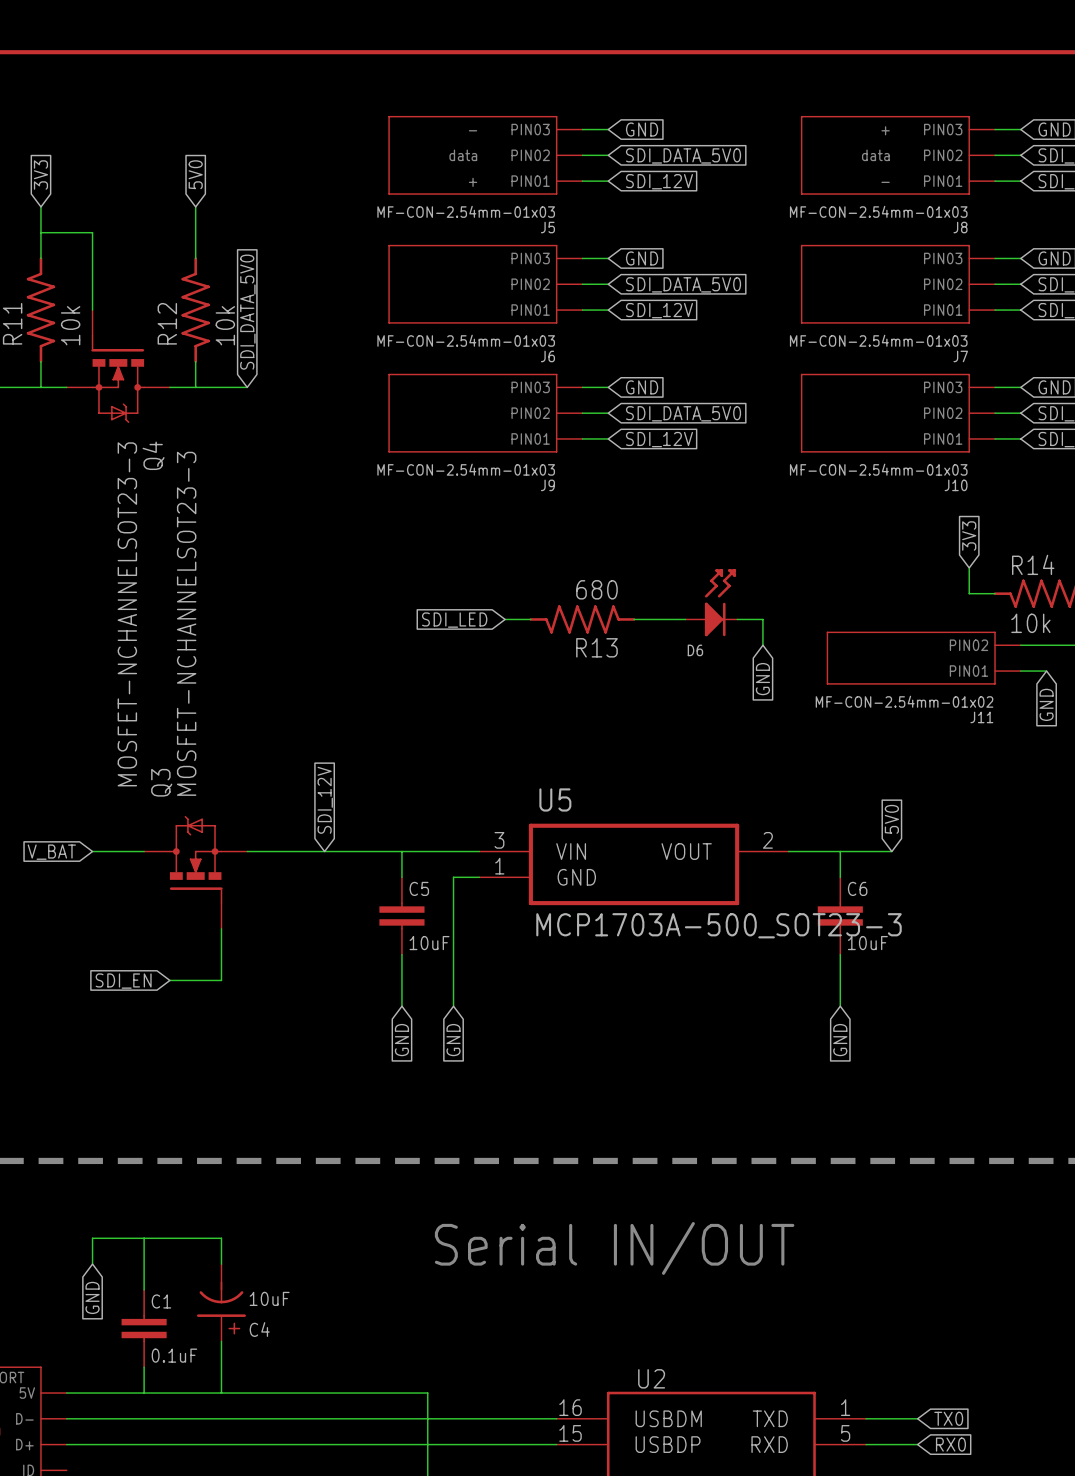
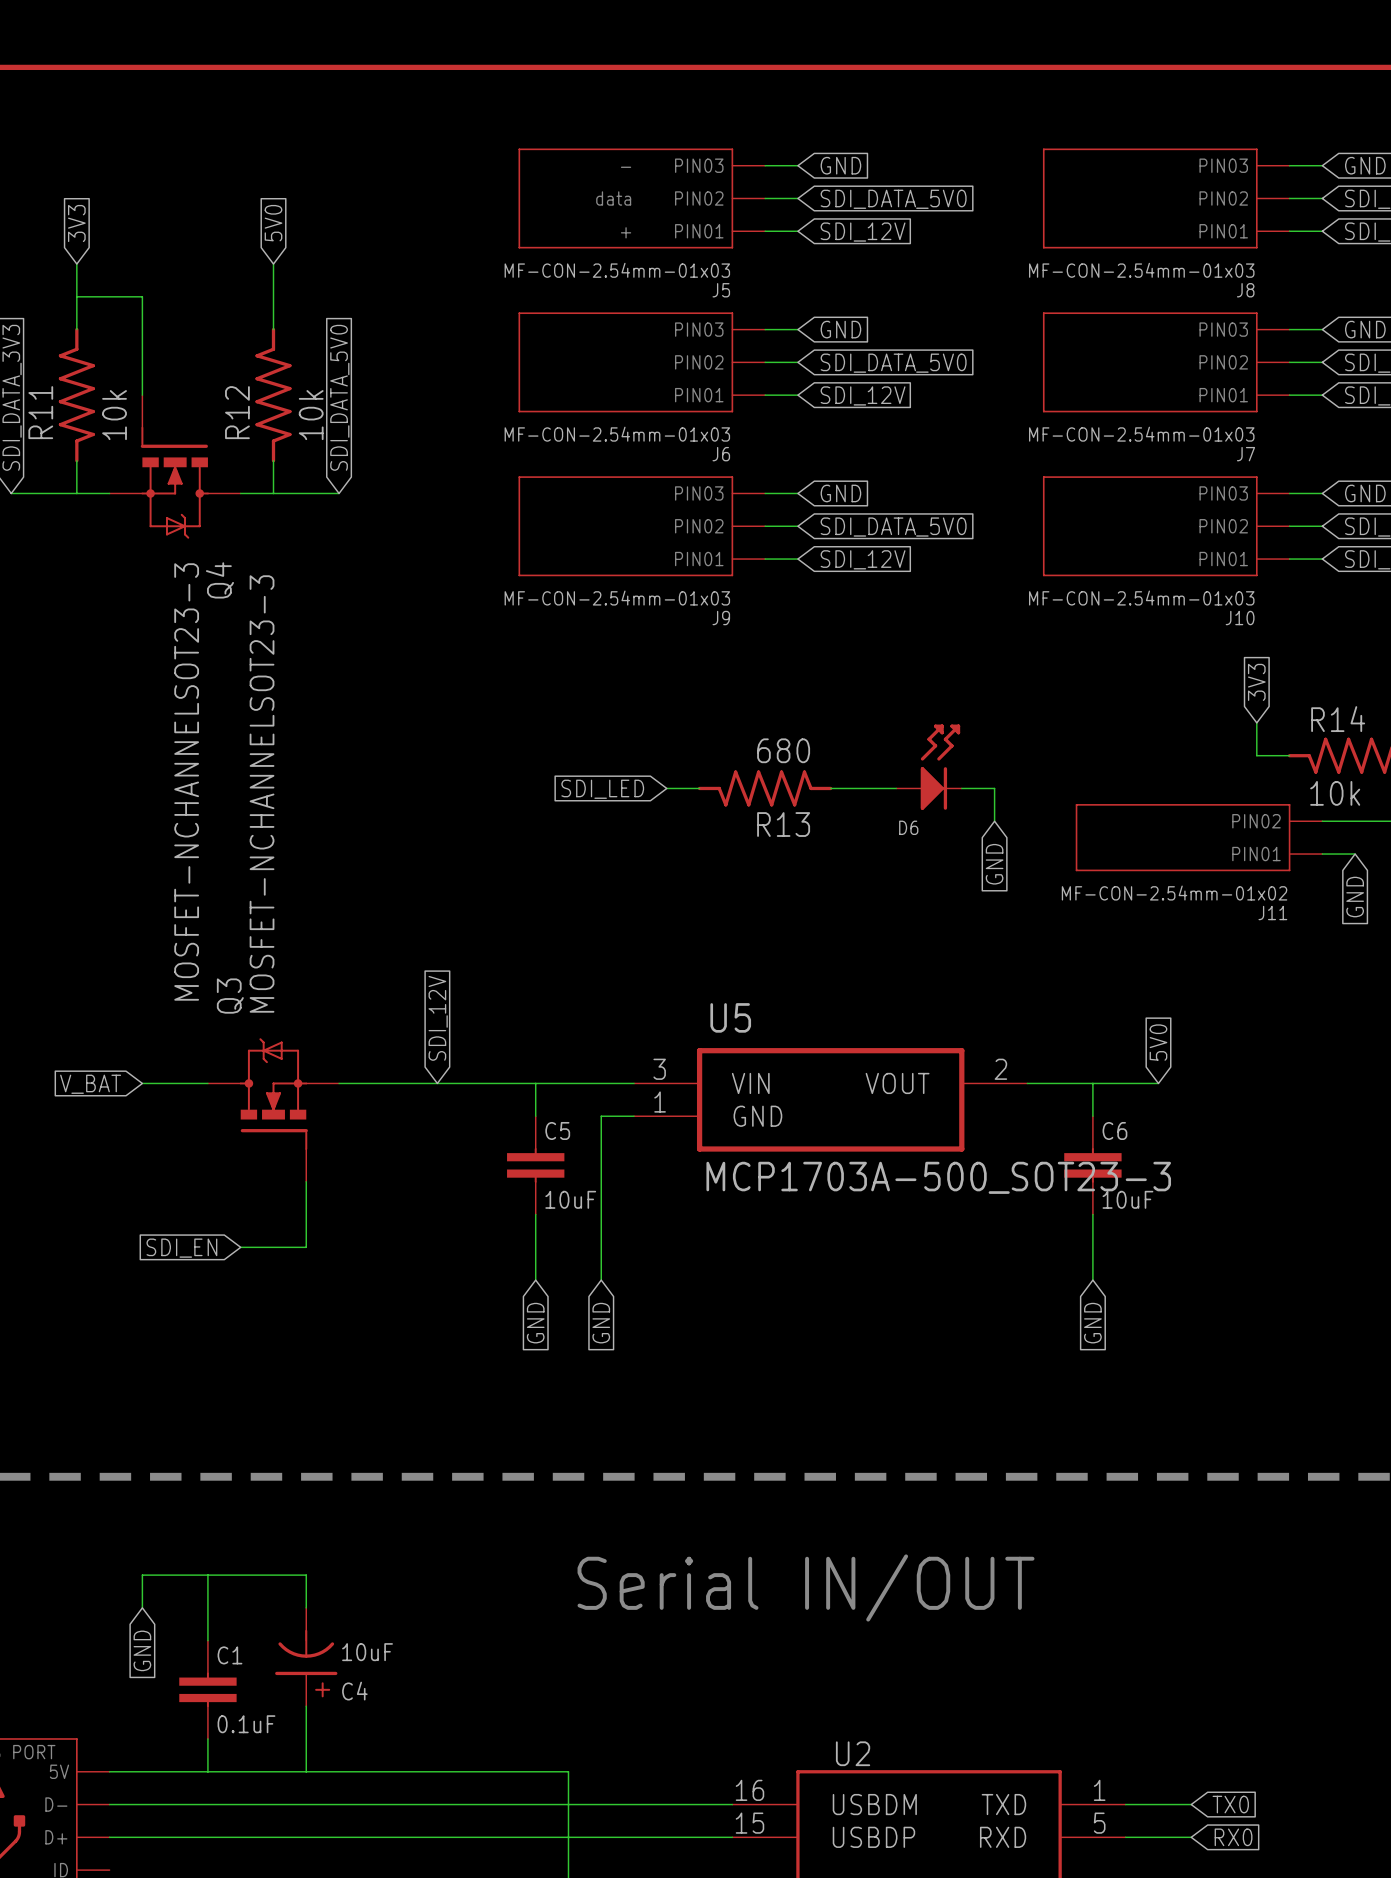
J8 text: + (885, 130) -> none
J8 text: data (875, 155) -> none
J8 text: - (885, 182) -> none

